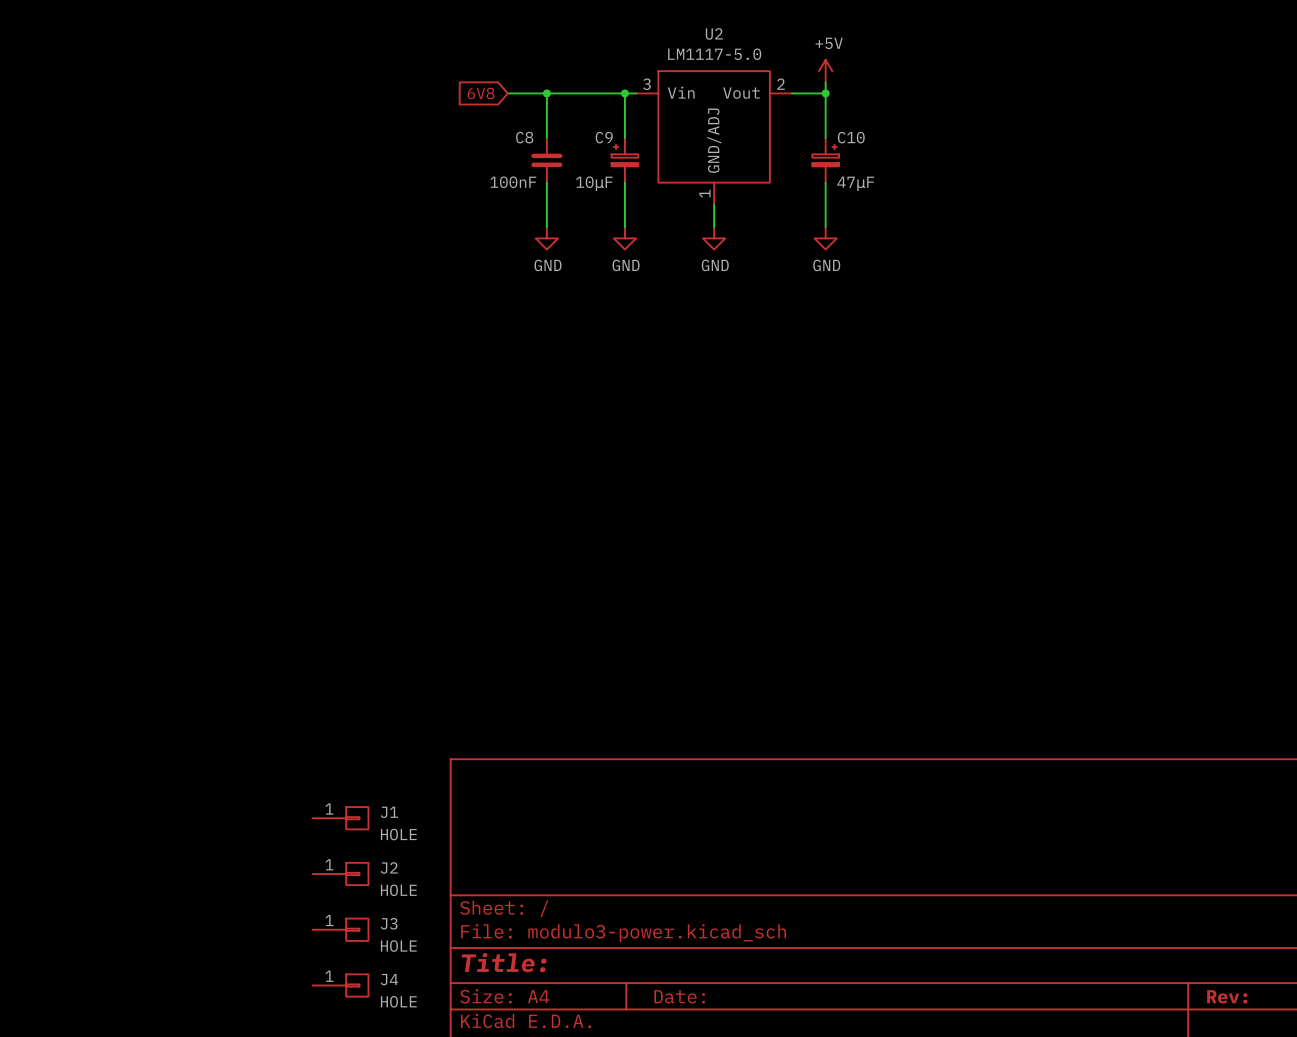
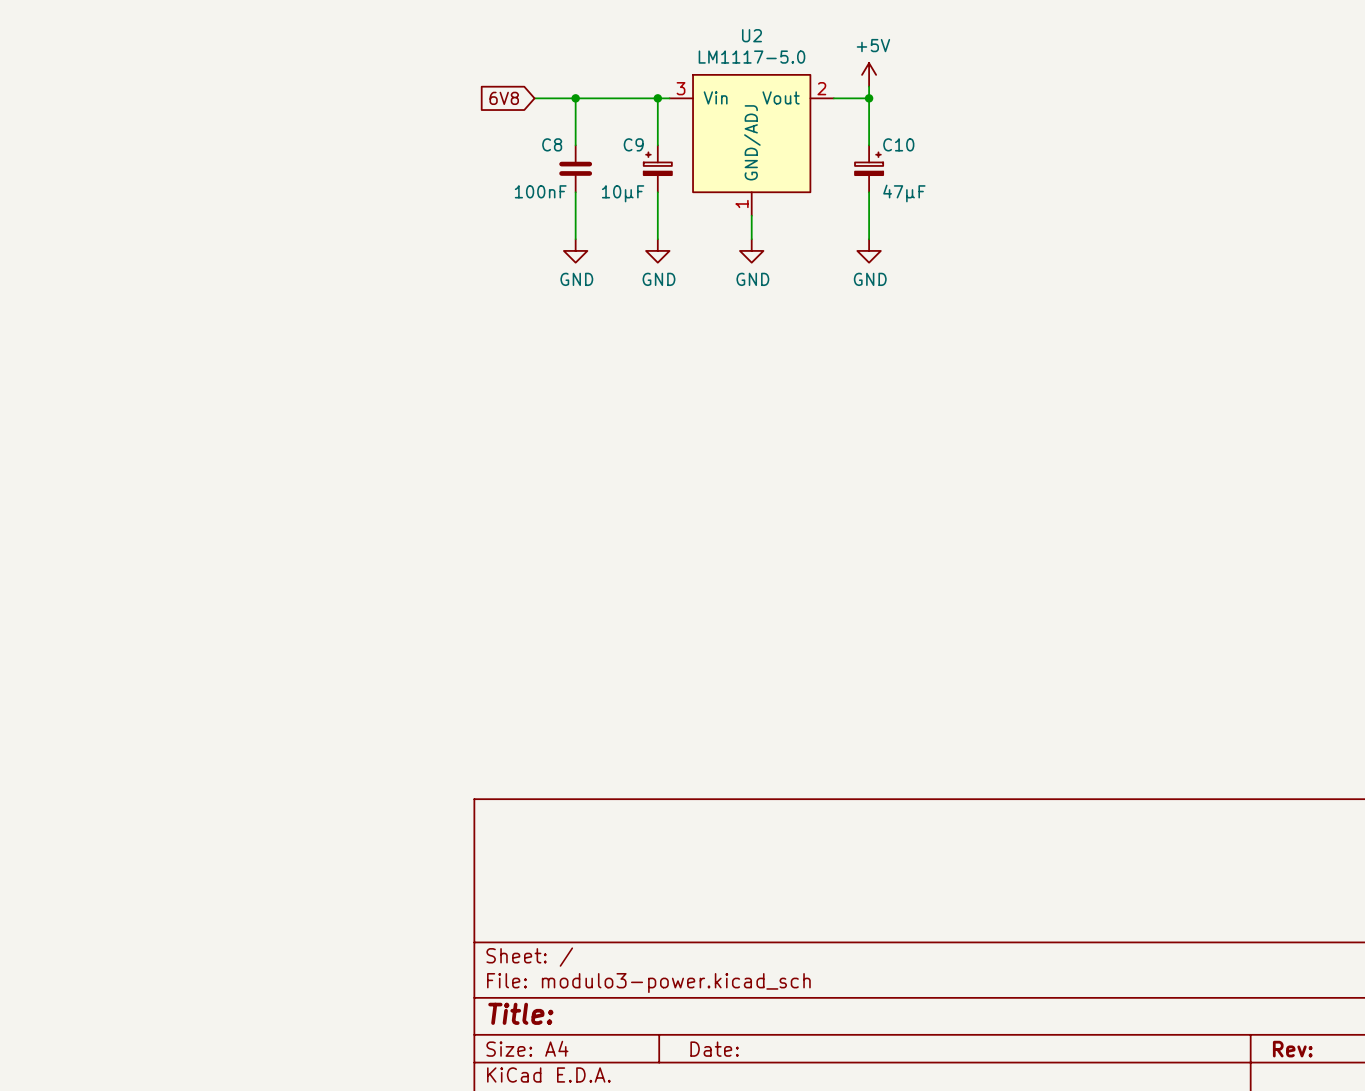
J1: HOLE (340, 818) -> none
J2: HOLE (340, 873) -> none
J3: HOLE (340, 929) -> none
J4: HOLE (340, 985) -> none

